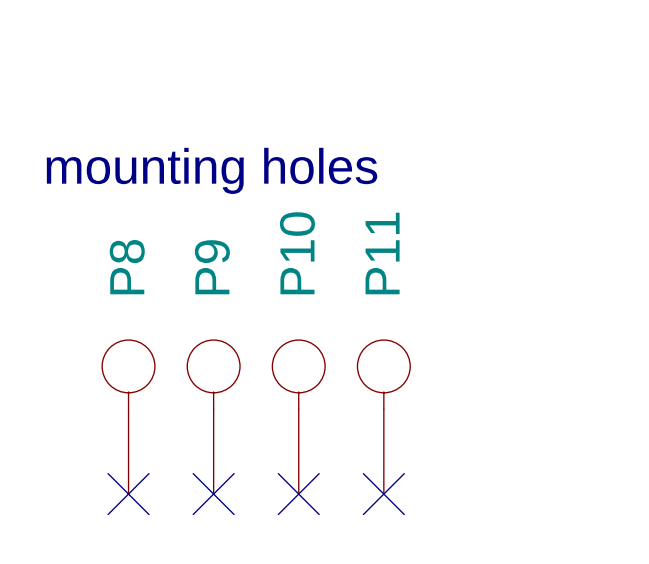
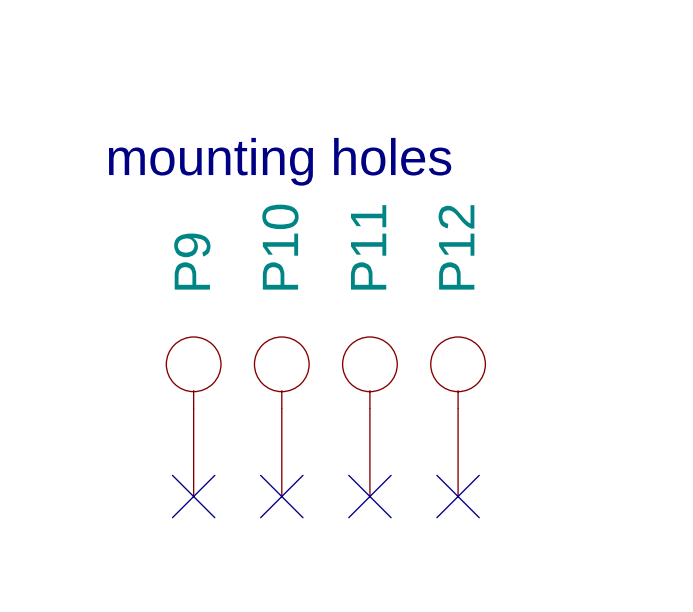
P10 name: P10 (297, 253) -> P11 (368, 247)
P11 name: P11 (382, 253) -> P12 (456, 247)
P8 name: P8 (127, 267) -> P9 (192, 261)
P9 name: P9 (212, 267) -> P10 (280, 247)

